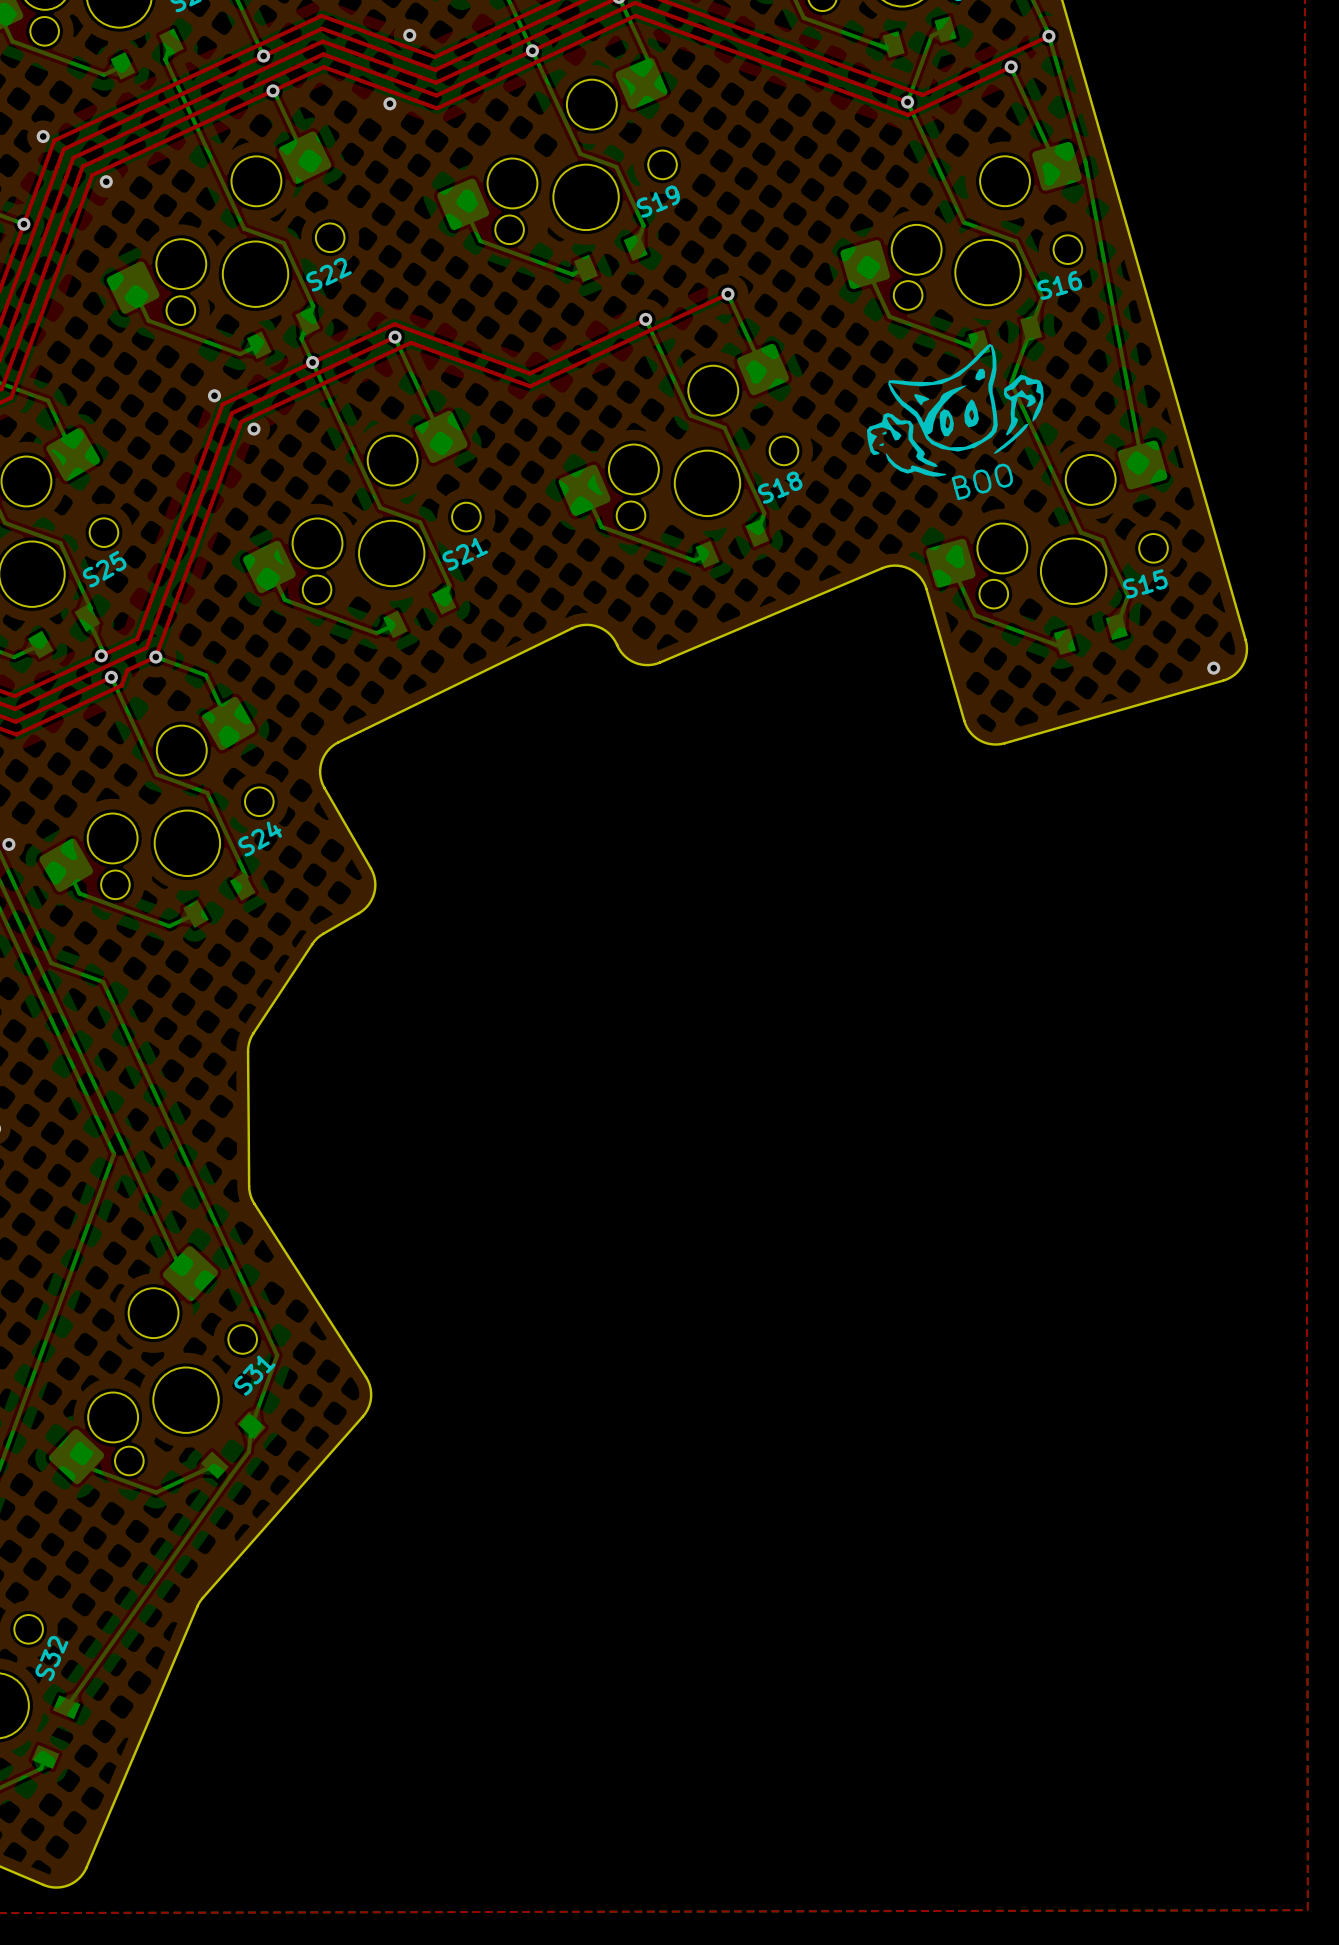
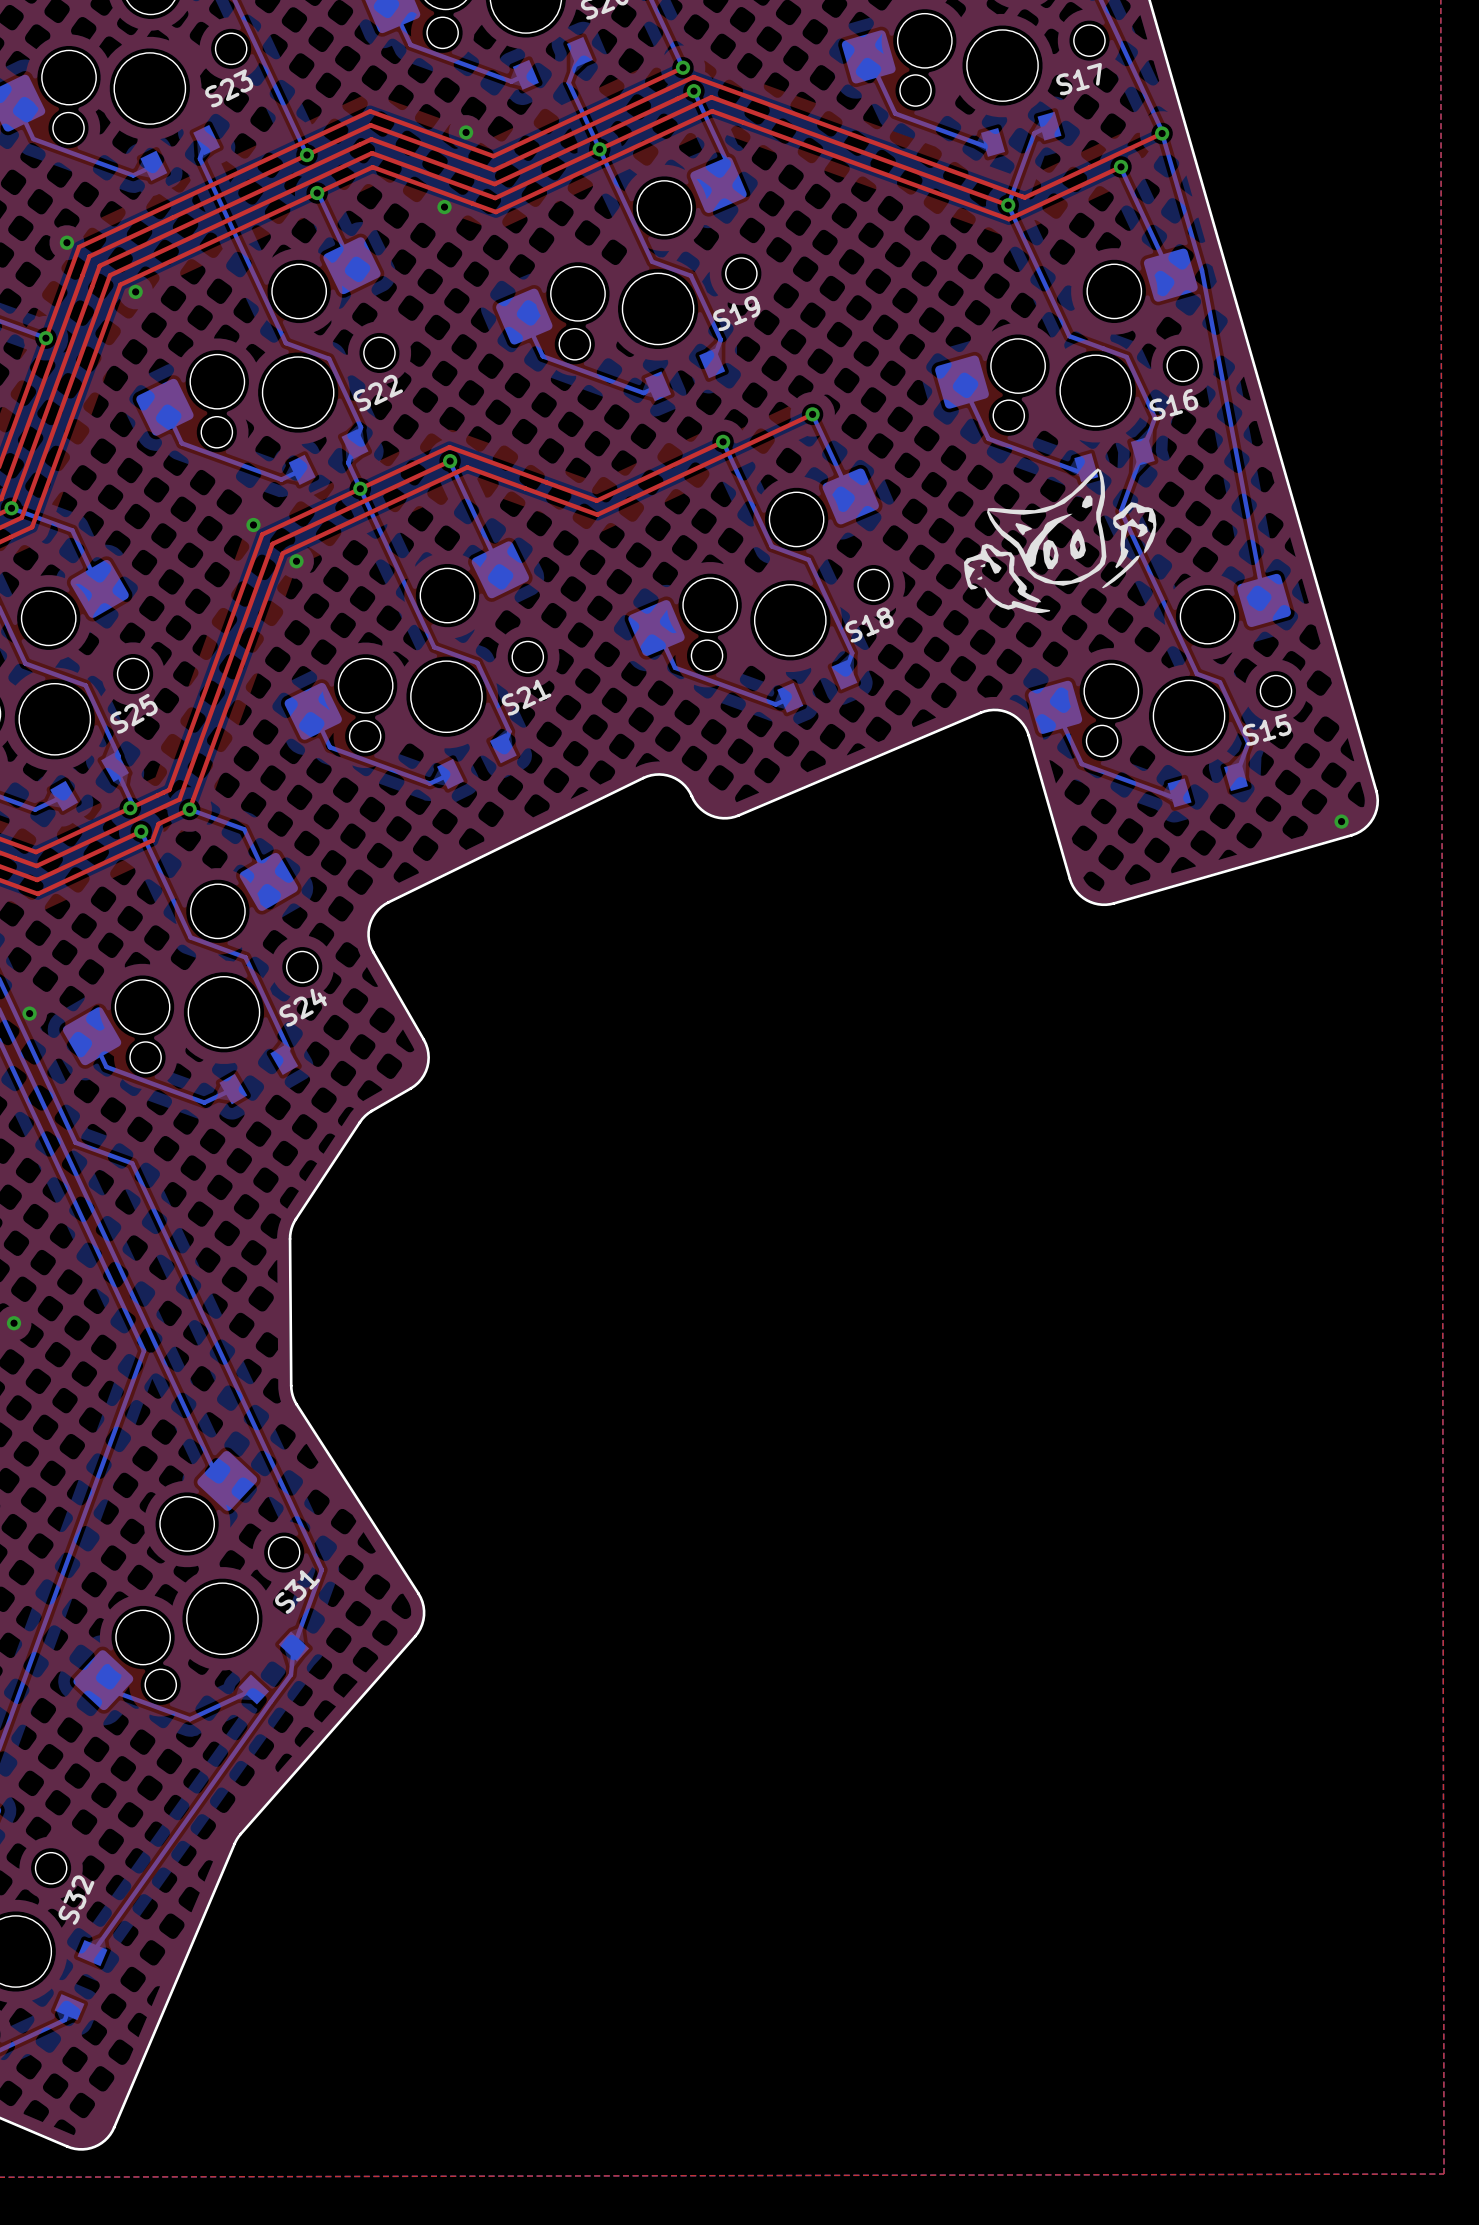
text: BOO (982, 481) -> none

